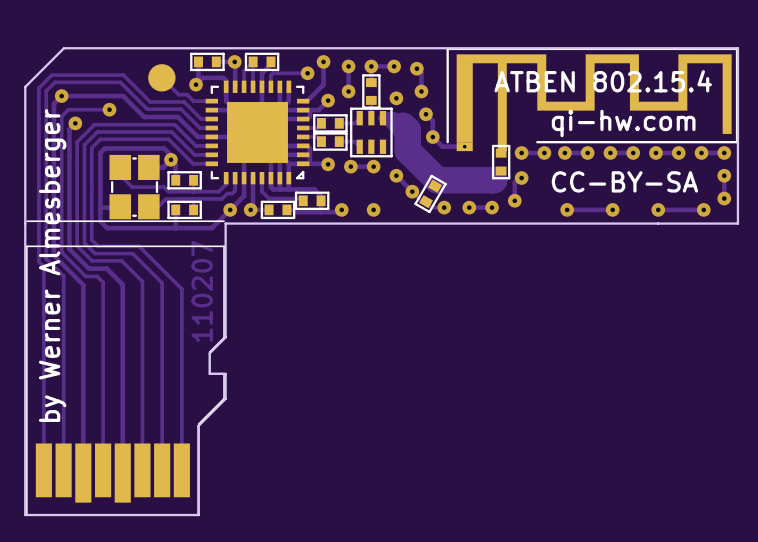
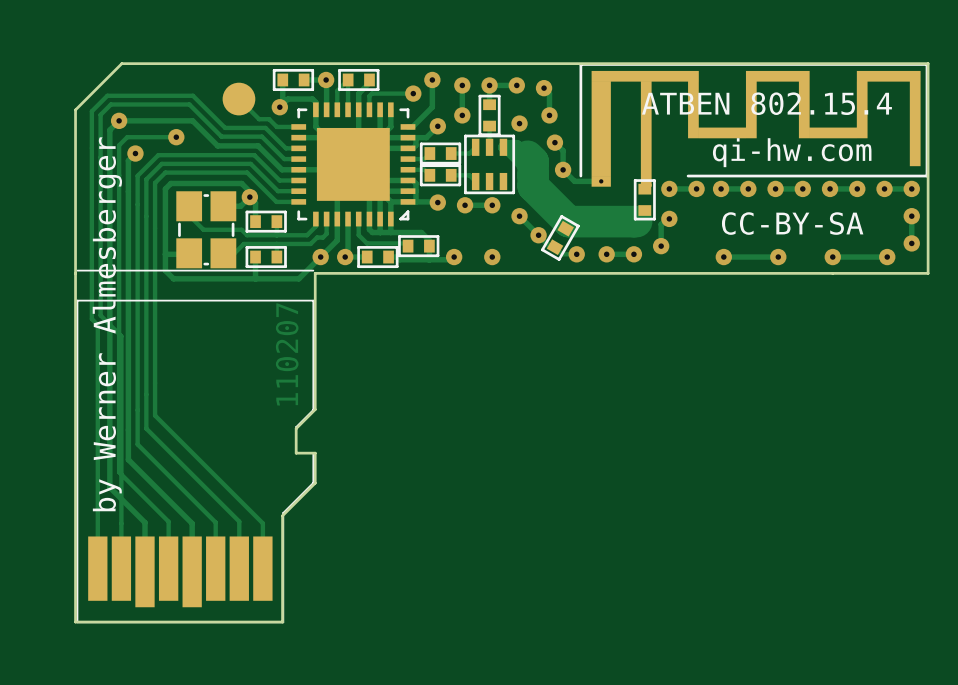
track: (91, 239) (98, 246) (139, 246) (181, 289) (181, 432) -> (155, 292) (155, 415) (262, 523)
track: (84, 242) (95, 253) (132, 253) (162, 283) (162, 431) -> (146, 296) (146, 428) (239, 521)
track: (77, 245) (92, 260) (121, 260) (142, 281) (142, 431) -> (137, 300) (137, 444) (215, 522)
track: (69, 249) (88, 268) (106, 268) (122, 284) (122, 432) -> (128, 303) (128, 459) (192, 523)
track: (61, 252) (85, 276) (97, 276) (103, 282) (103, 431) -> (119, 307) (119, 472) (168, 521)
track: (53, 255) (83, 284) (83, 431) -> (109, 311) (109, 487) (144, 522)

